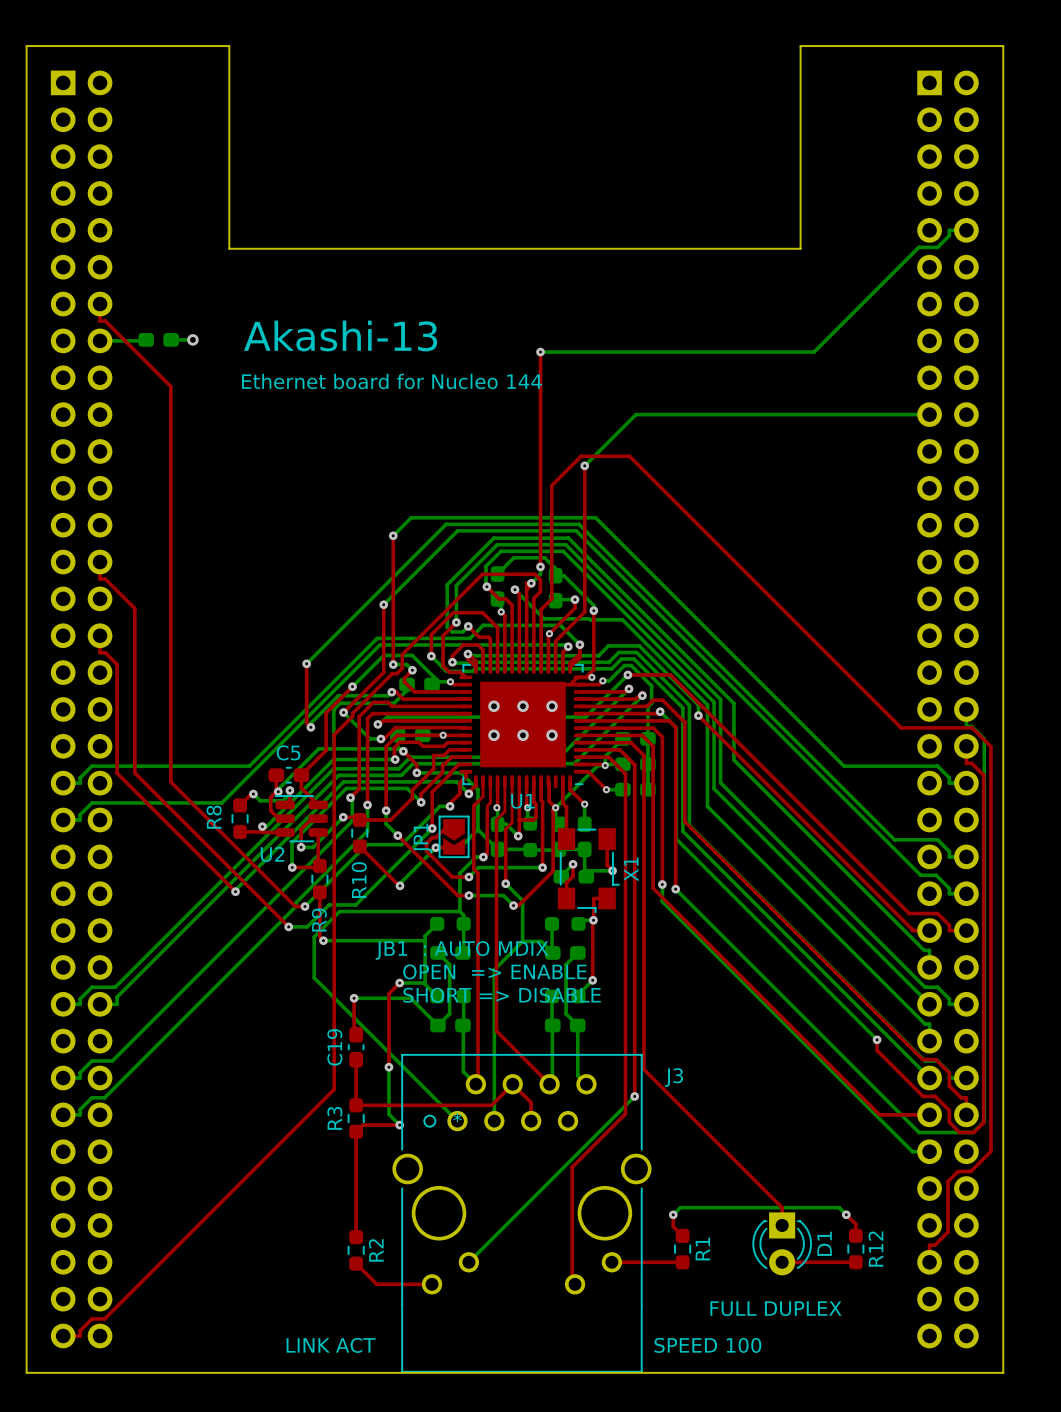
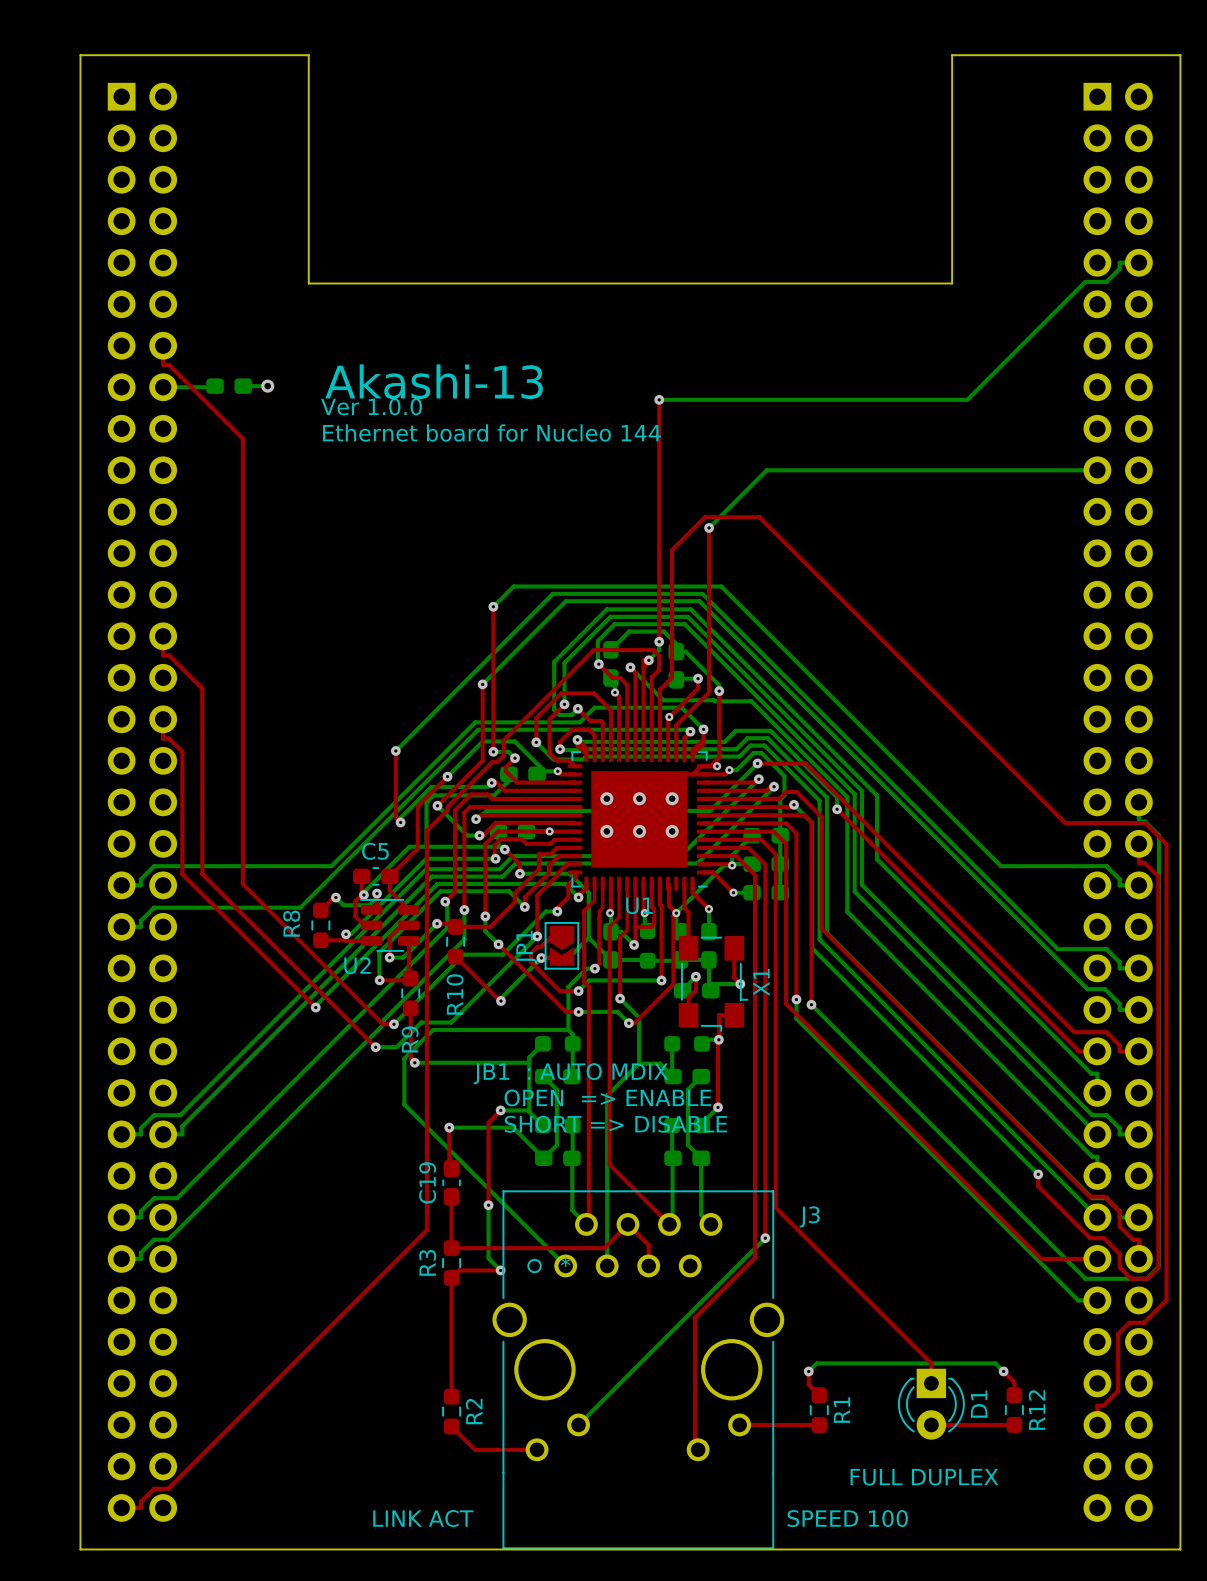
text: none -> Ver 1.0.0 (371, 406)

